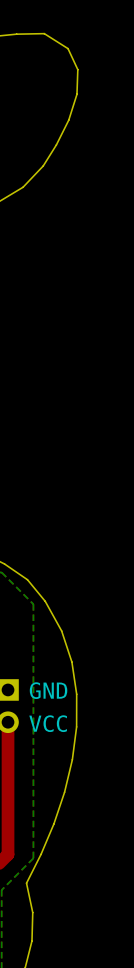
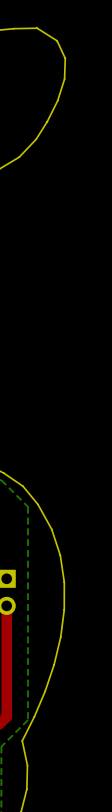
text: GND (48, 690) -> none
text: VCC (48, 723) -> none

